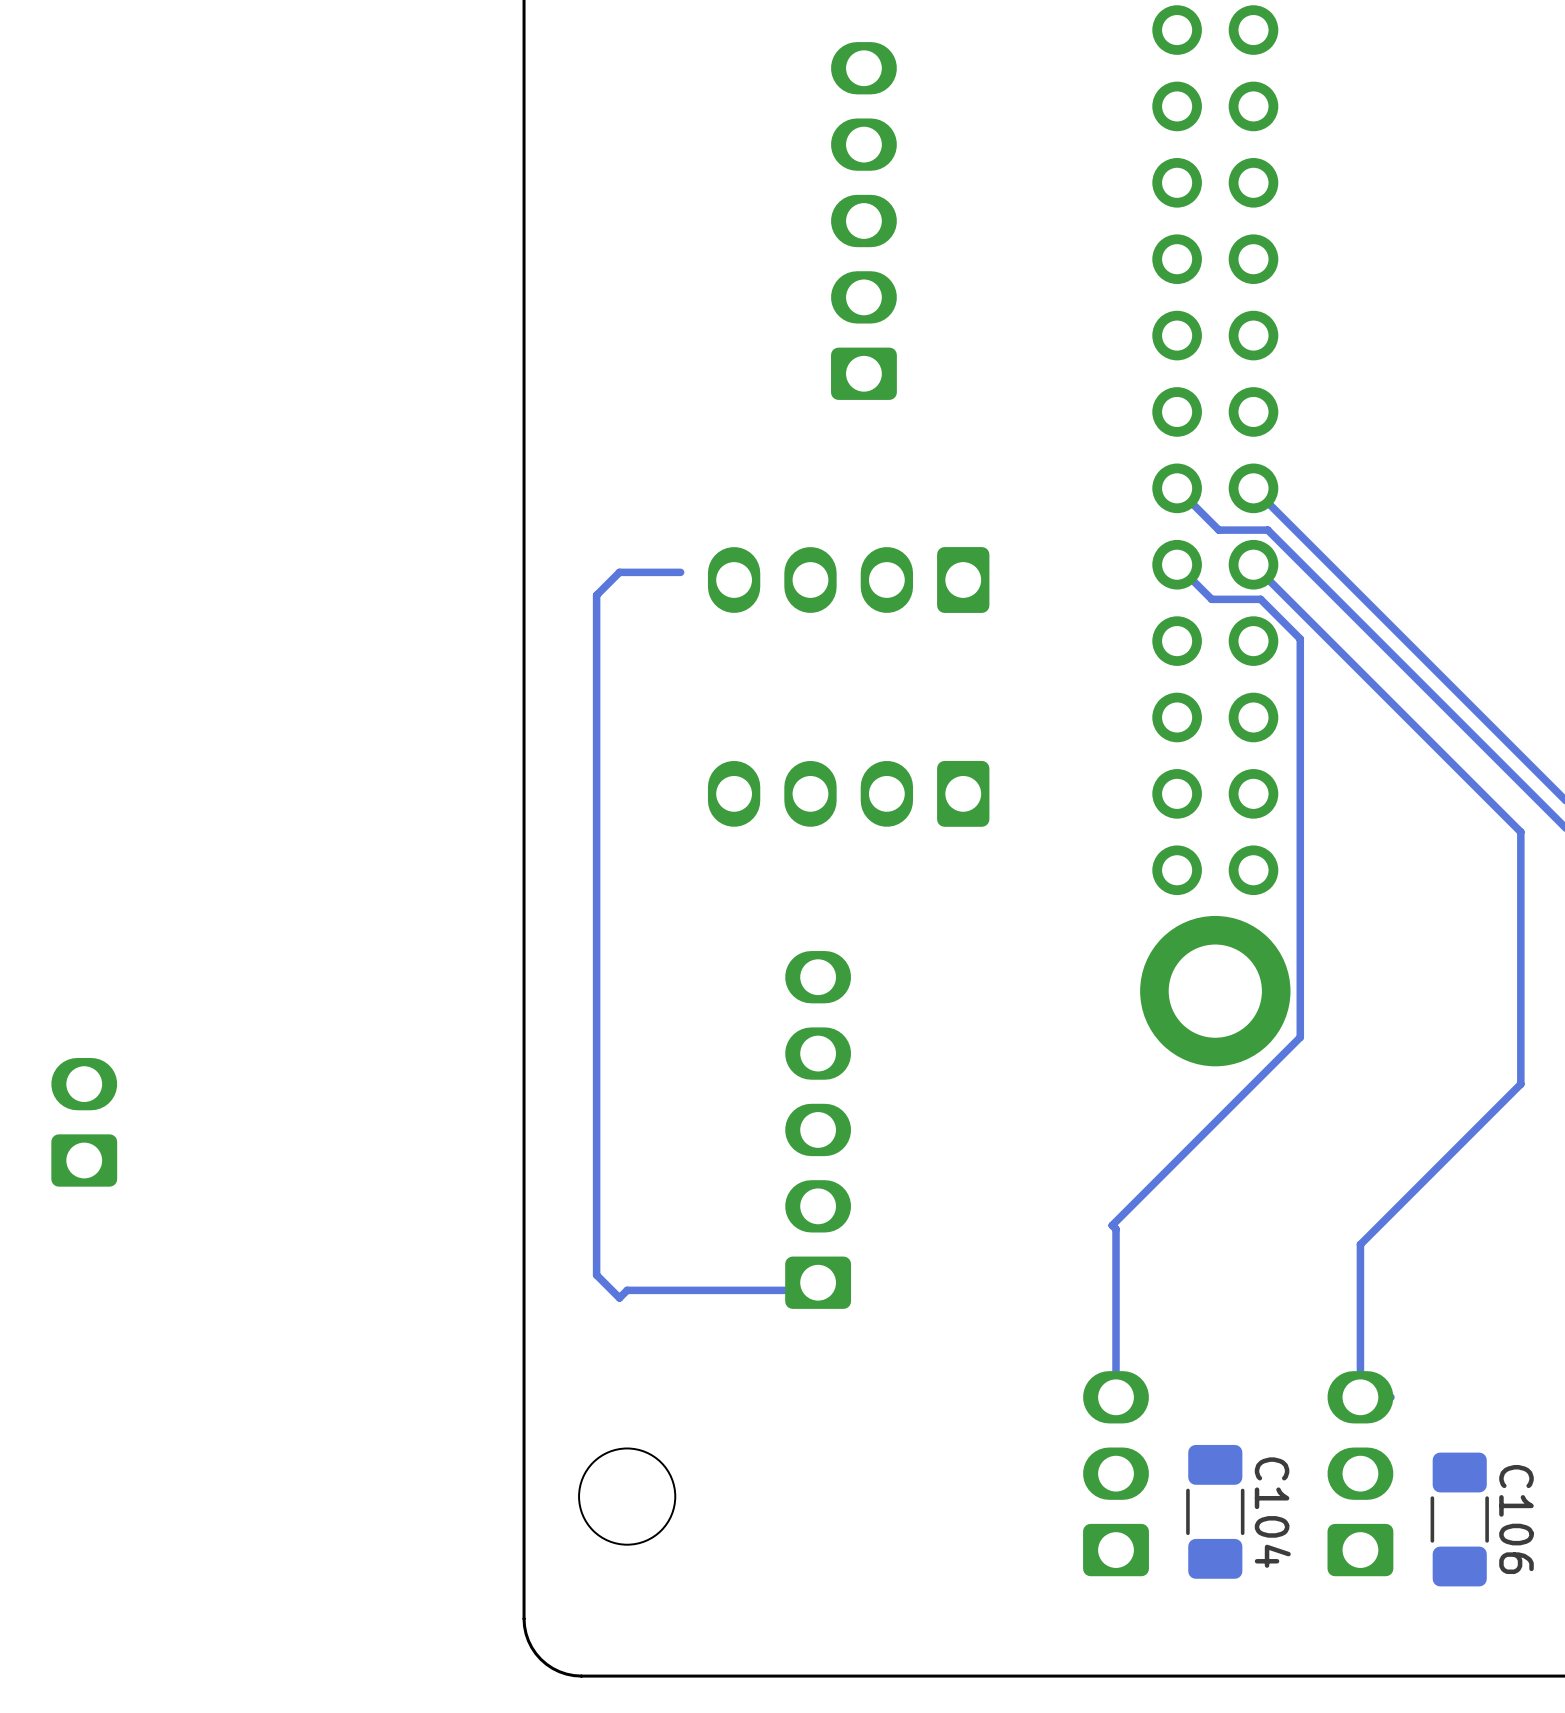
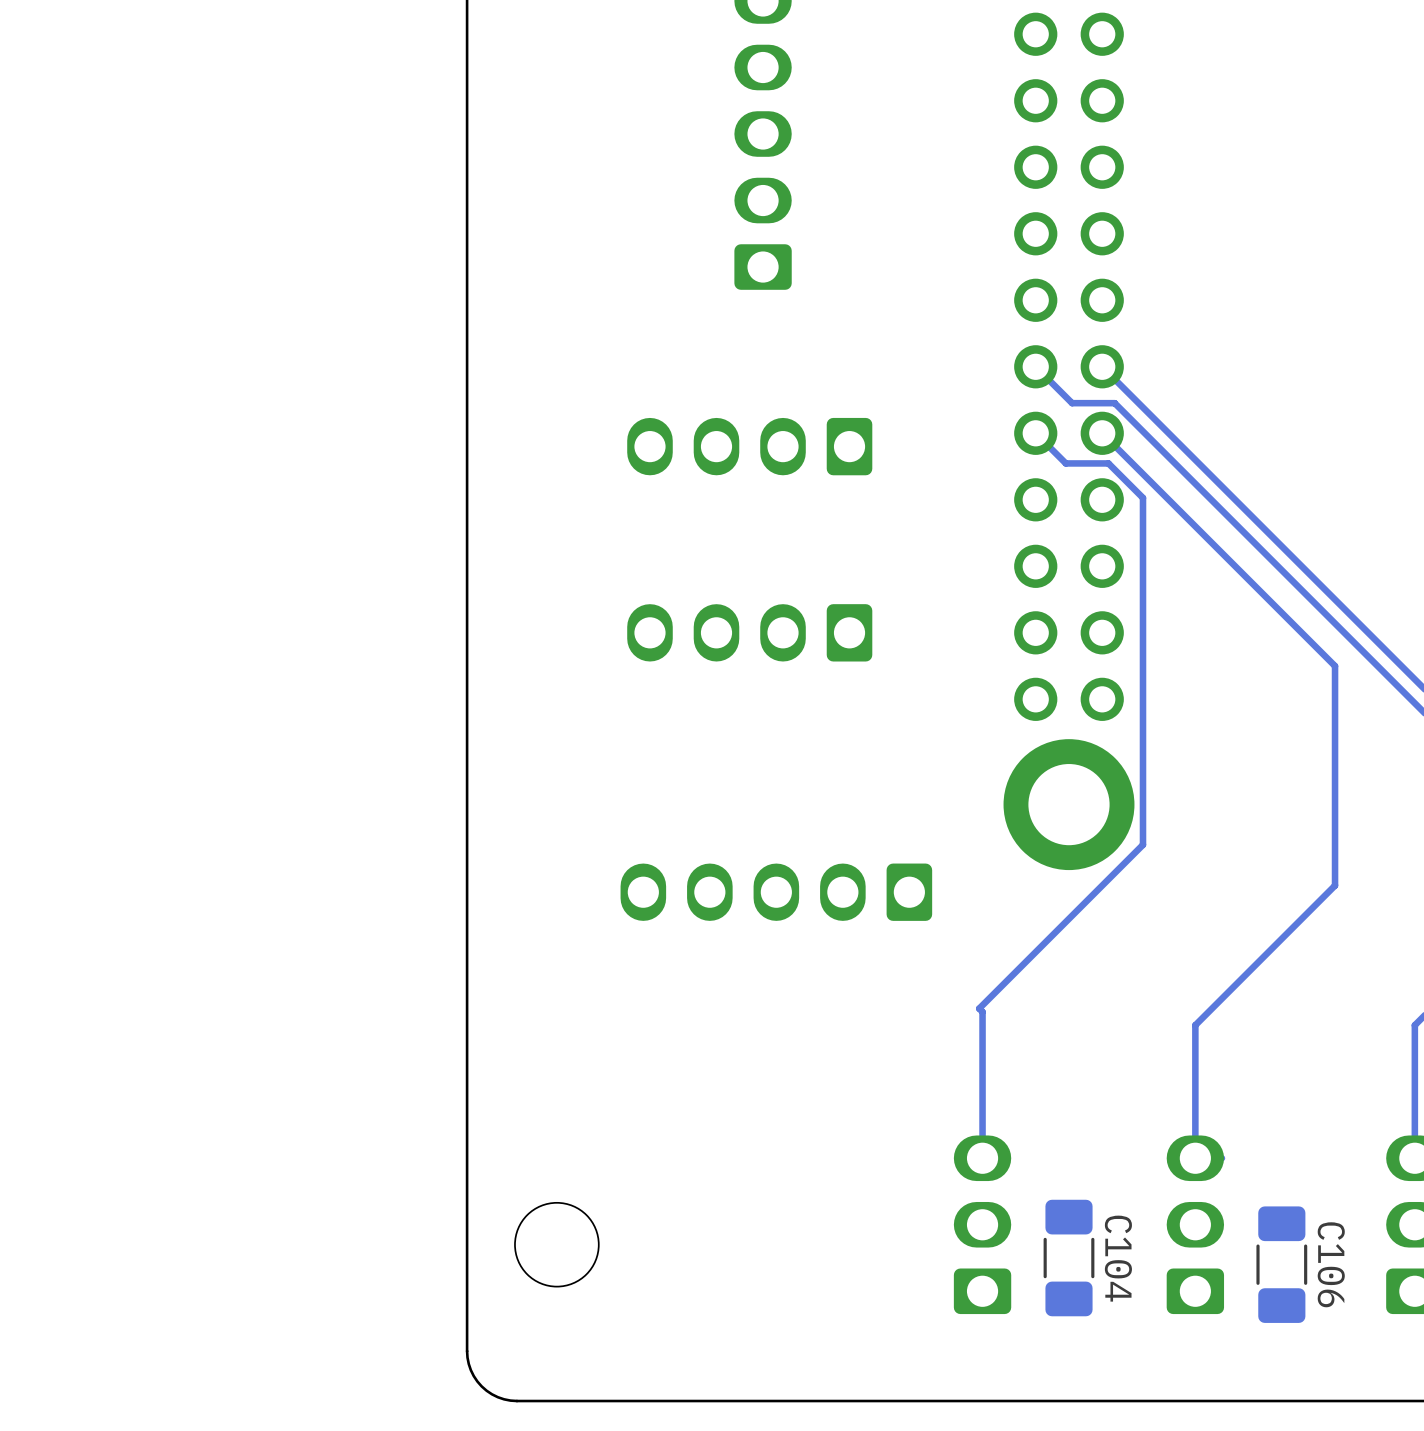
track: (680, 572) (619, 572) (596, 595) (596, 1275) (619, 1297) (627, 1290) (810, 1290) (818, 1282) -> none
part: (84, 1122) -> none
part rotation: 0° (818, 1129) -> 90° counterclockwise (776, 892)

